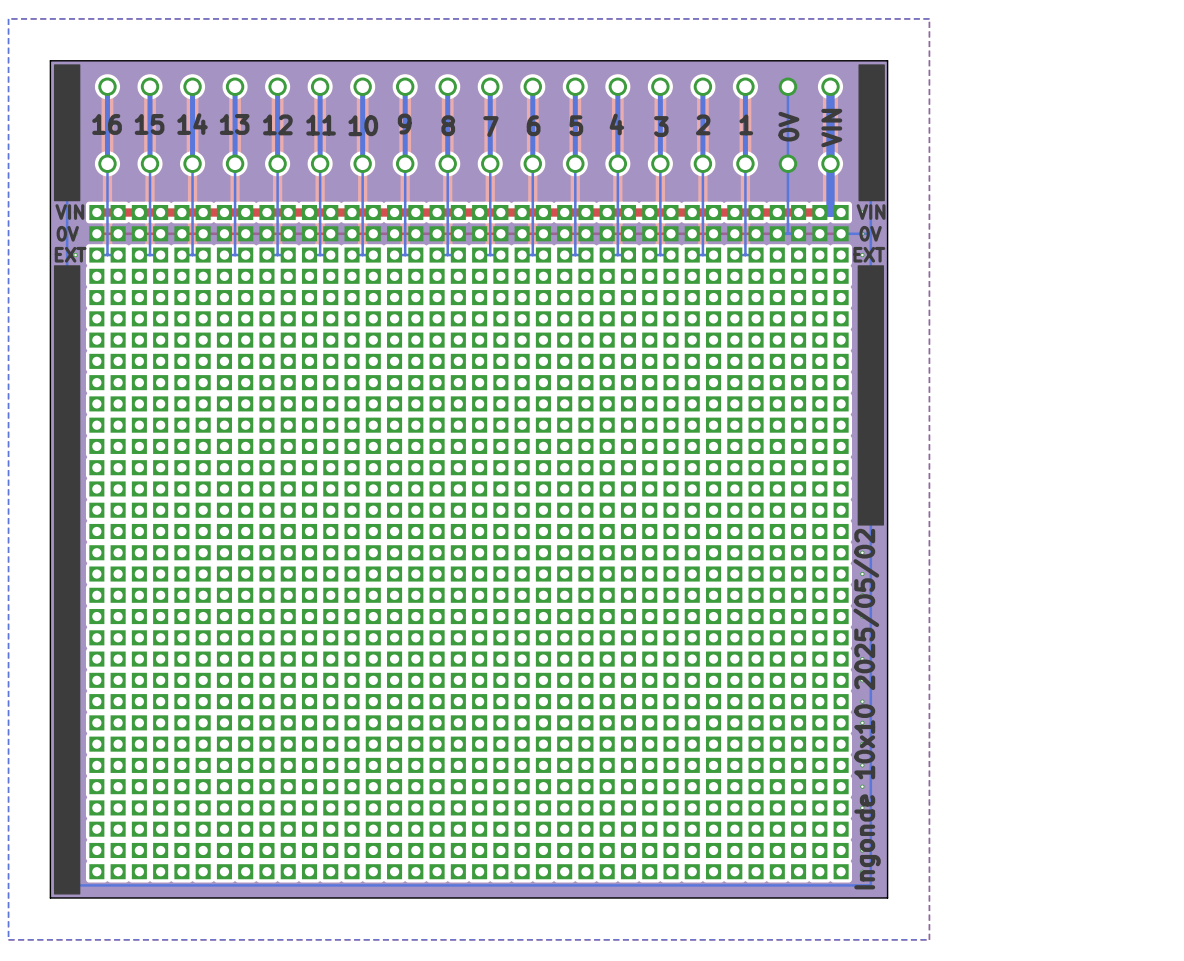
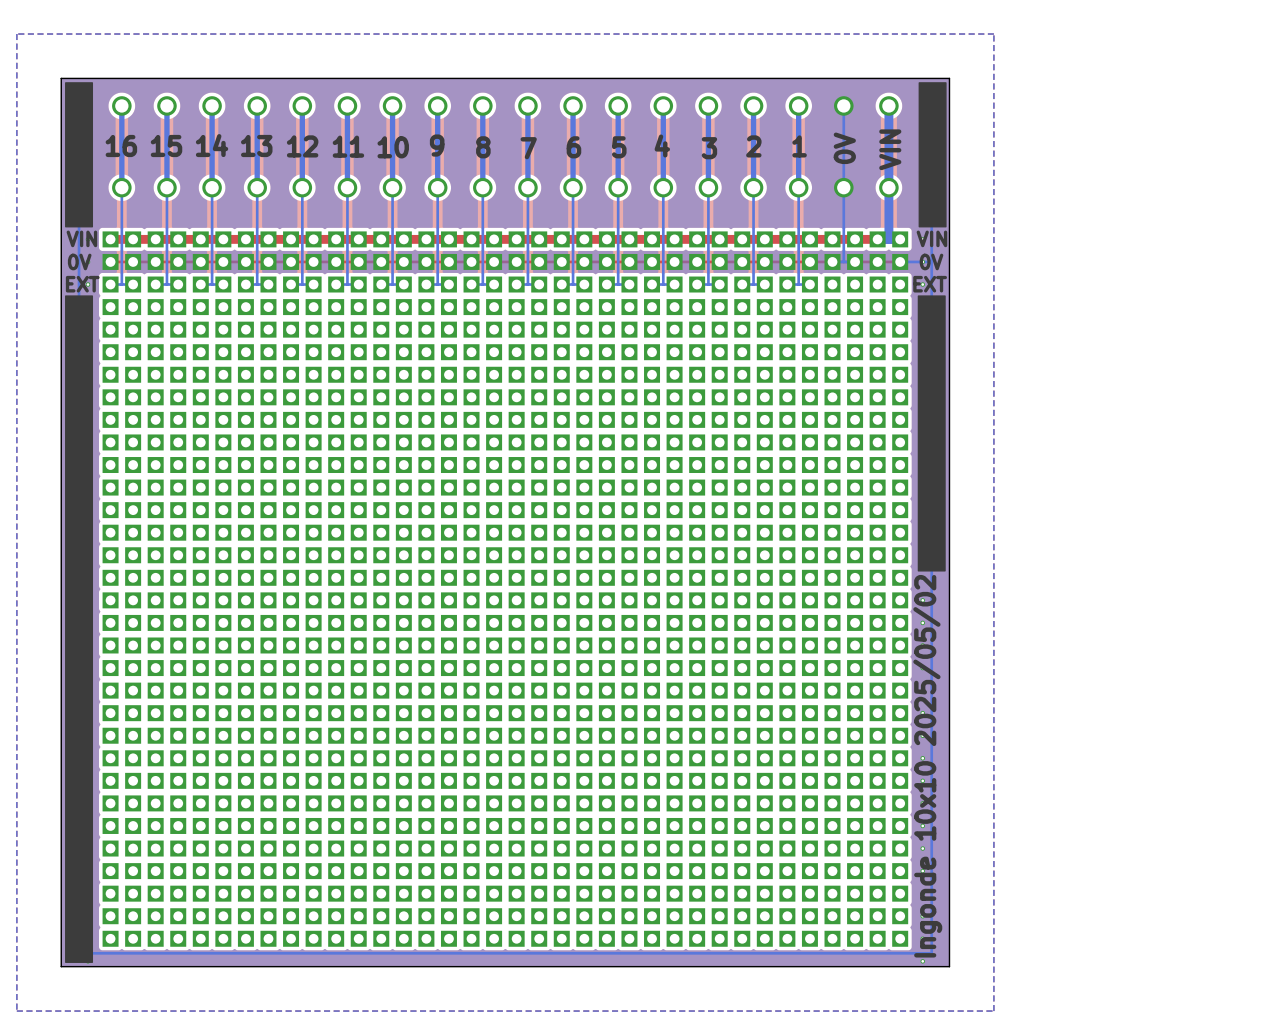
via: none -> (922, 961)

